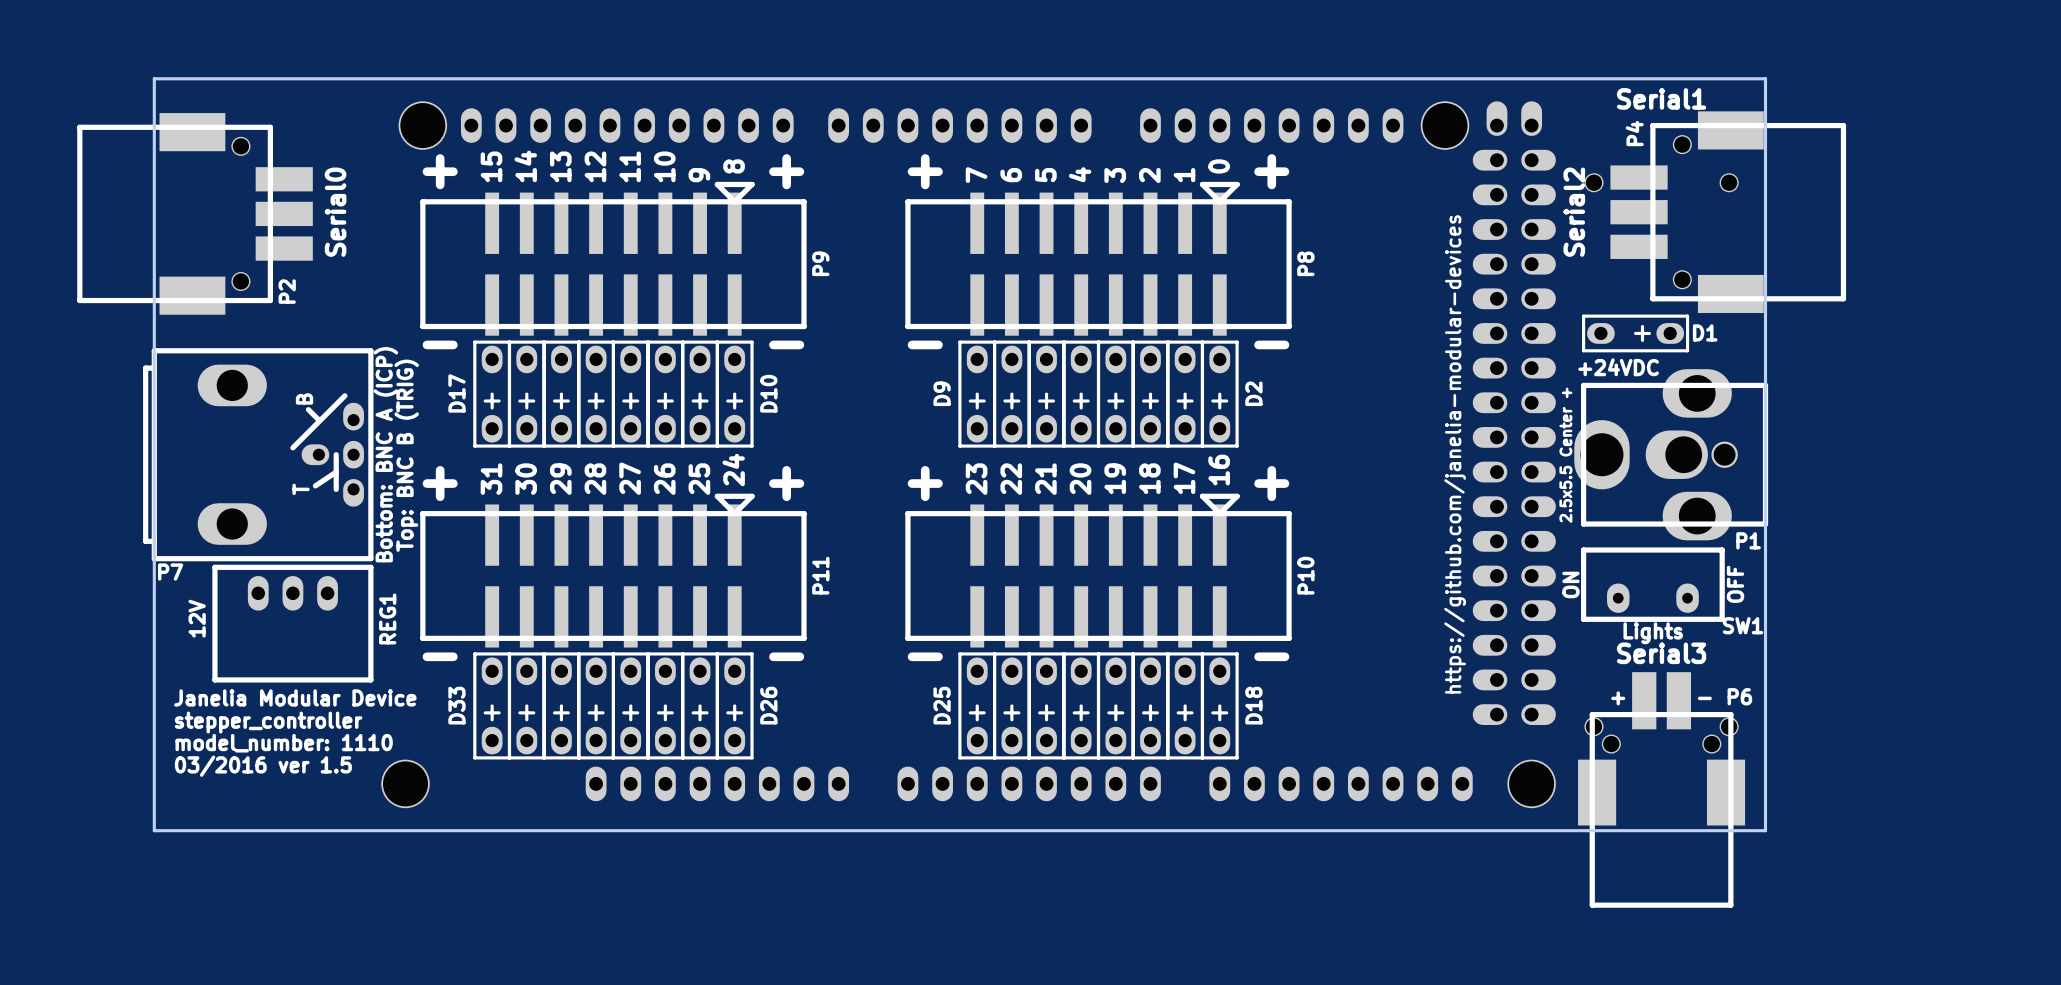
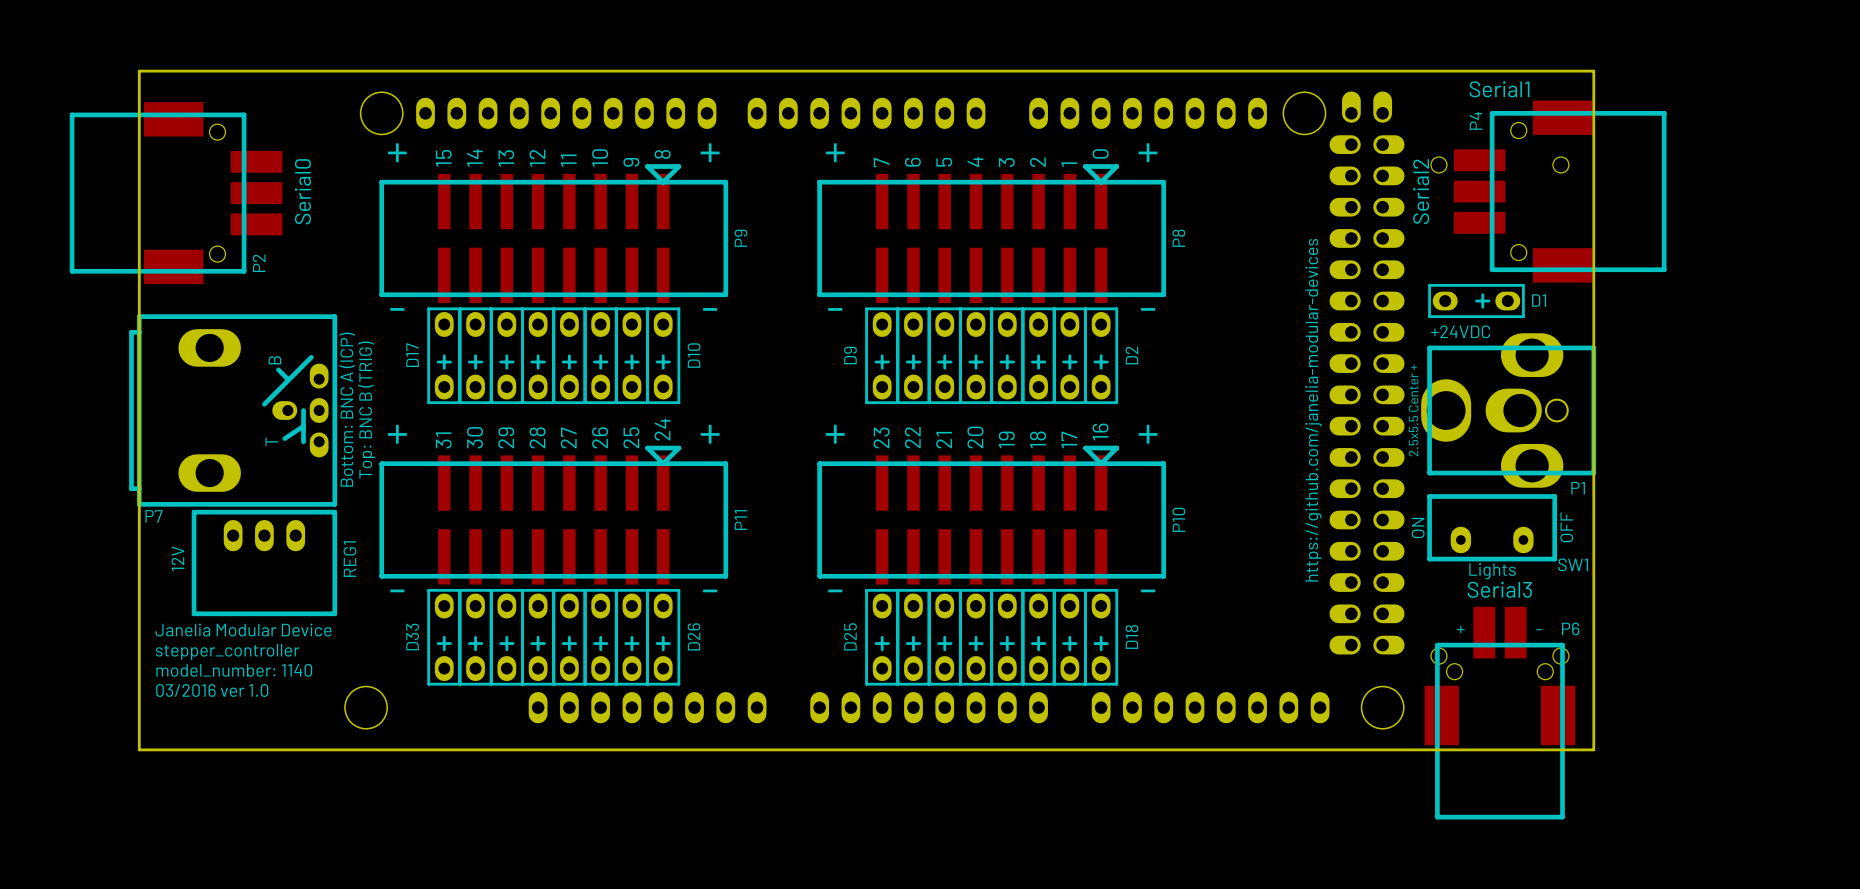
text: model_number: 1110 (284, 743) -> model_number: 1140 (234, 670)
text: 03/2016 ver 1.5 (263, 766) -> 03/2016 ver 1.0 (212, 690)

